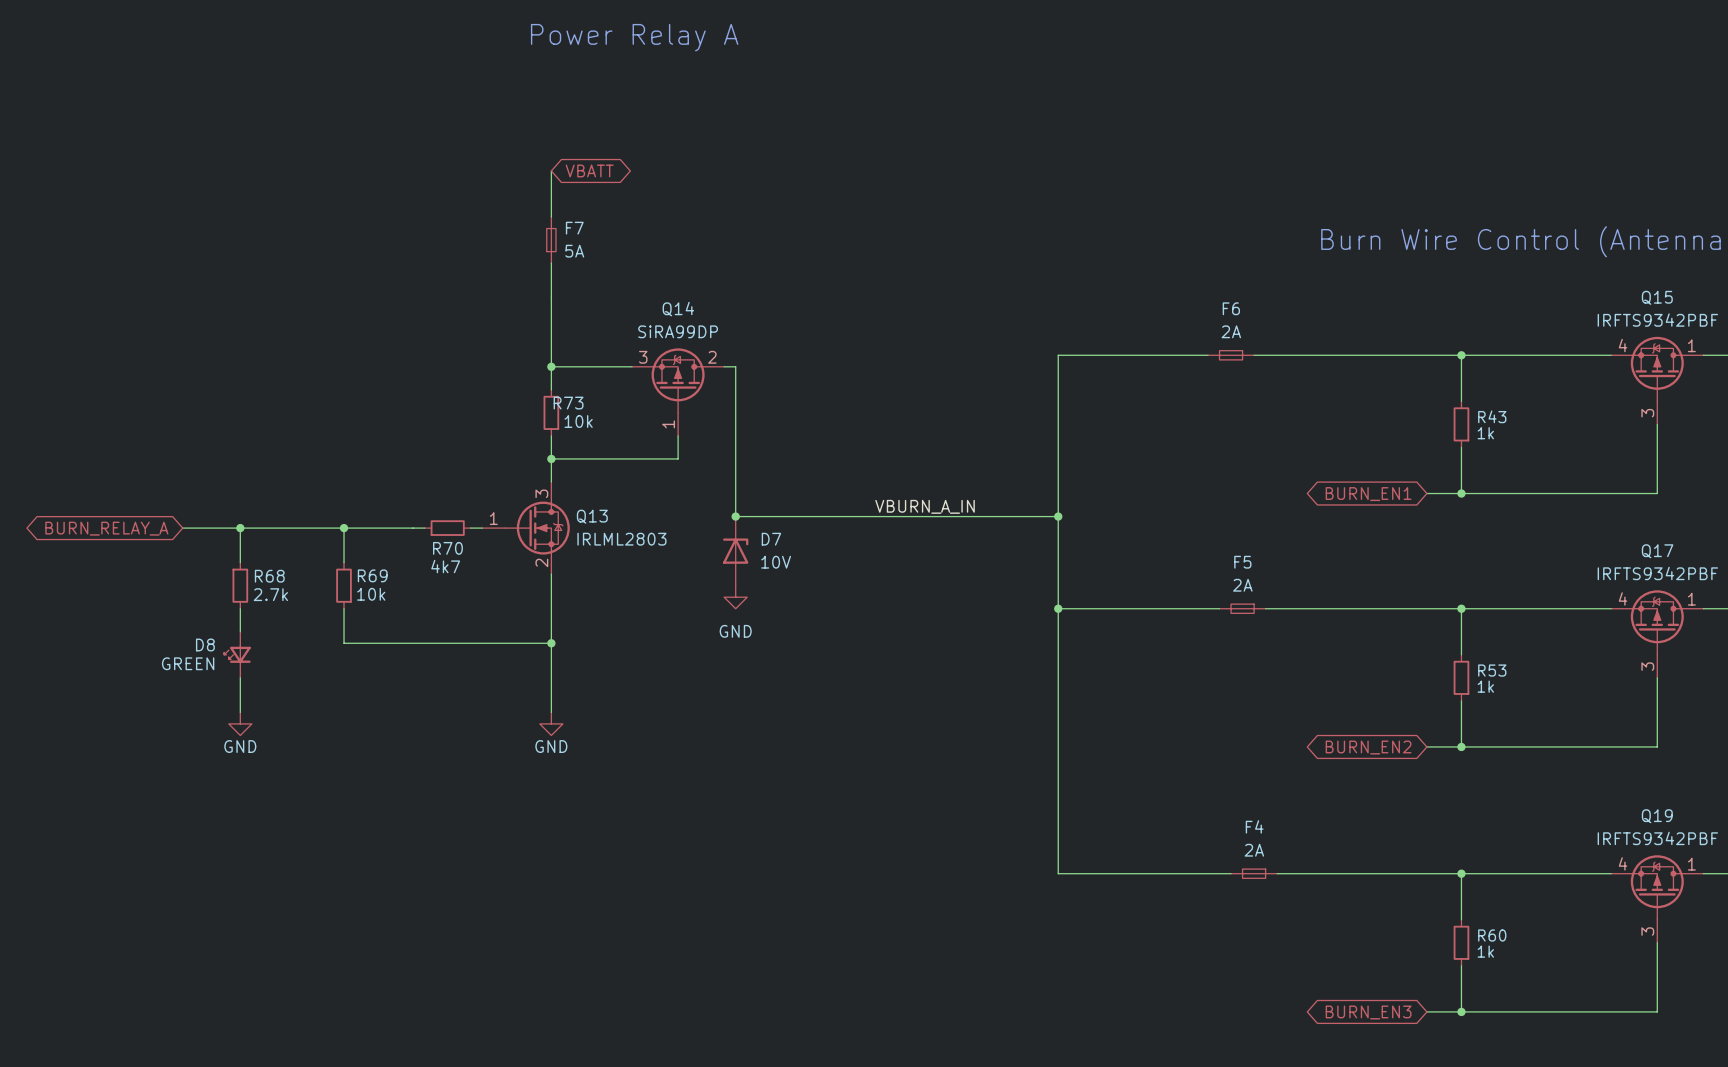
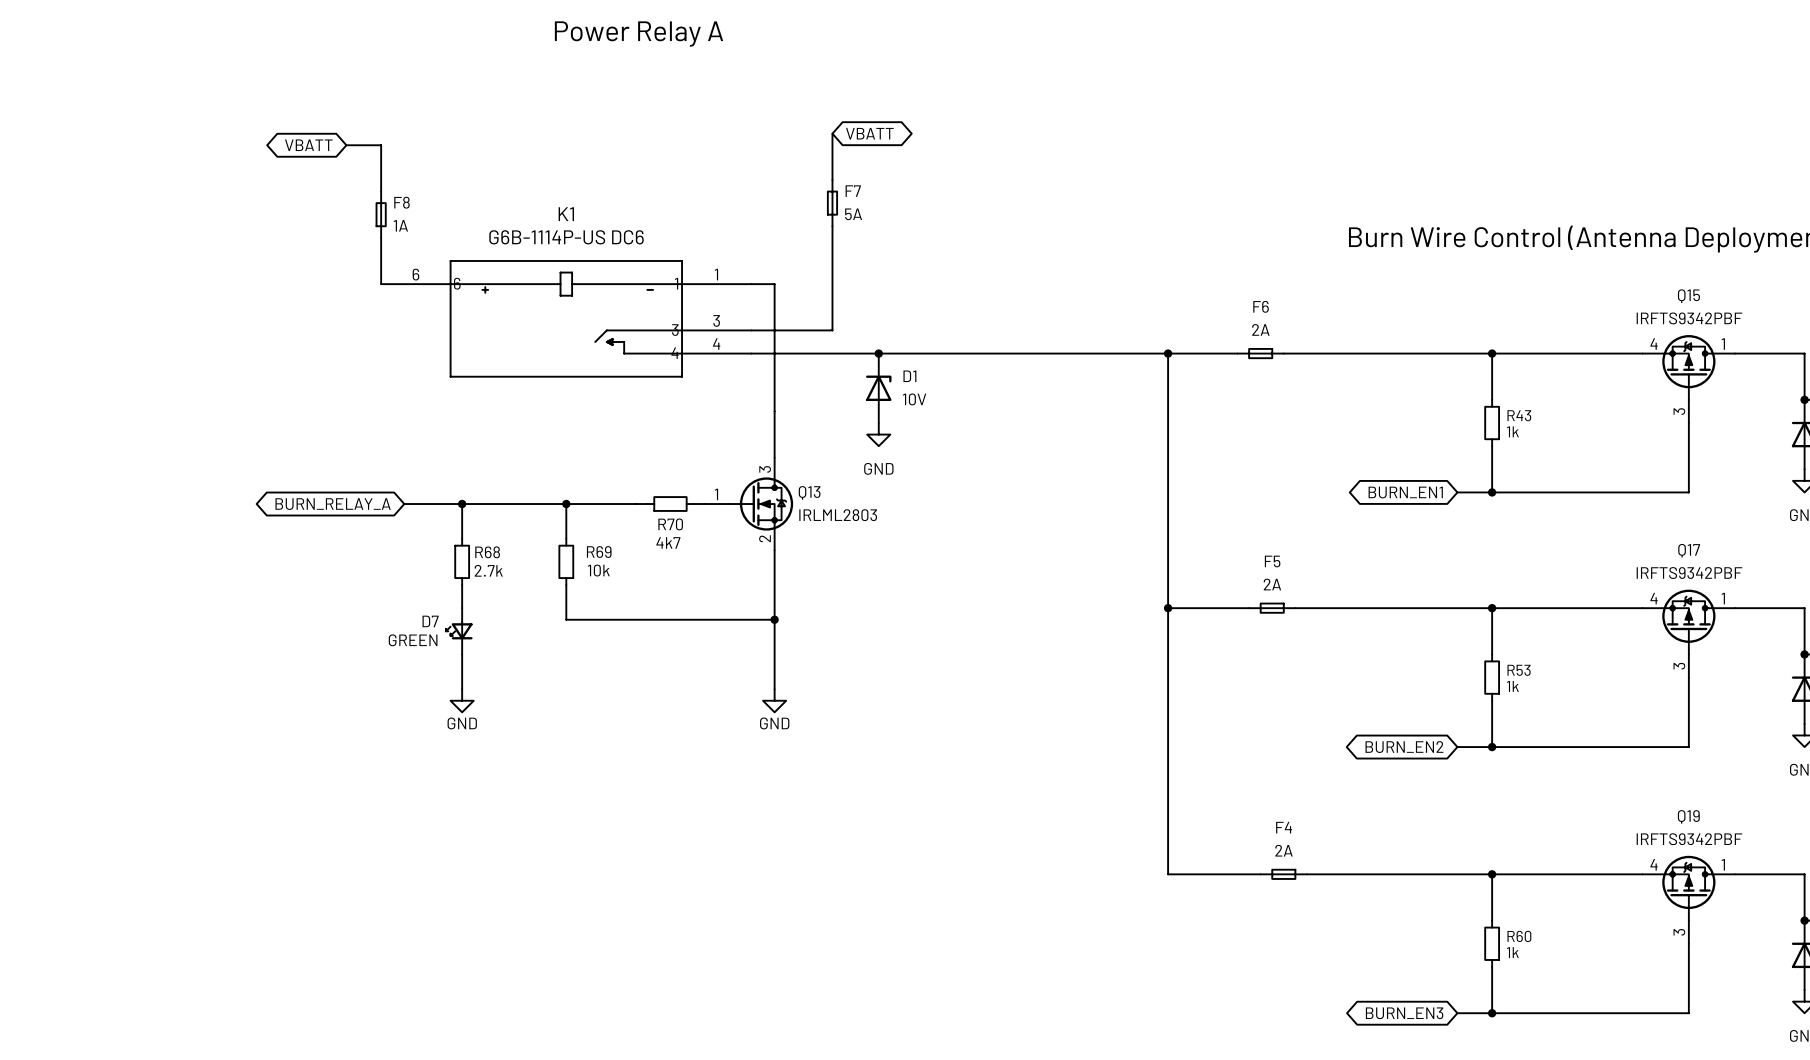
wire: none -> (832, 133) (832, 179)
global label: none -> VBATT (869, 133)
global label: none -> VBATT (308, 145)
wire: none -> (346, 145) (381, 145) (381, 191)
wire: (551, 170) (551, 217) -> (381, 237) (381, 284)
global label: VBATT (589, 170) -> none
F8: none -> 1A (381, 214)
wire: none -> (832, 226) (832, 330) (751, 330)
F7 position: (551, 240) -> (832, 203)
wire: (551, 263) (551, 389) -> none
wire: none -> (751, 284) (774, 284) (774, 457)
K1: none -> G6B-1114P-US DC6 (566, 318)
wire: none -> (751, 353) (1087, 353)
junction: none -> (878, 353)
wire: (1058, 355) (1058, 873) (1138, 873) -> (1168, 353) (1168, 874)
junction: none -> (1168, 353)
wire: (551, 366) (632, 366) -> none
junction: (551, 366) -> none
wire: (724, 366) (735, 366) (735, 516) (1058, 516) -> none
D1: none -> 10V (878, 388)
Q14: SiRA99DP (678, 392) -> none
R73: 10k (551, 412) -> none
wire: (551, 435) (551, 482) -> none
wire: (678, 435) (678, 458) (551, 458) -> none
power symbol: none -> GND (878, 434)
junction position: (551, 458) -> (566, 504)
junction: none -> (462, 504)
label: VBURN_A_IN (925, 506) -> none
D7 symbol: [723, 516, 749, 586] -> [445, 608, 473, 655]
junction: (735, 516) -> none
junction: (1058, 516) -> none
global label position: BURN_RELAY_A (106, 528) -> BURN_RELAY_A (333, 504)
wire: (182, 528) (424, 528) -> (404, 504) (647, 504)
wire: (240, 528) (240, 562) -> (462, 504) (462, 538)
junction: (240, 528) -> none
wire: (344, 528) (344, 562) -> (566, 504) (566, 538)
junction: (344, 528) -> none
R70 position: (447, 528) -> (670, 504)
wire: (470, 528) (482, 528) -> (693, 504) (705, 504)
Q13 position: (526, 528) -> (749, 504)
D7 name position: D7 (771, 539) -> D7 (430, 621)
D7 value: 10V (776, 562) -> GREEN (413, 640)
wire: (551, 574) (551, 712) -> (774, 550) (774, 689)
R68 position: (240, 585) -> (462, 561)
R69 position: (344, 585) -> (566, 561)
power symbol: GND (735, 597) -> none
wire: (240, 608) (240, 631) -> (462, 585) (462, 608)
wire: (344, 608) (344, 643) (551, 643) -> (566, 585) (566, 619) (774, 619)
wire: (1058, 608) (1138, 608) -> none
junction: (1058, 608) -> none
junction: none -> (1168, 608)
junction: none -> (774, 619)
junction: (551, 643) -> none
D8: GREEN (237, 654) -> none
wire: (240, 677) (240, 712) -> (462, 654) (462, 689)
power symbol: none -> GND (462, 700)
power symbol: none -> GND (774, 700)
power symbol: GND (240, 723) -> none
power symbol: GND (551, 723) -> none

